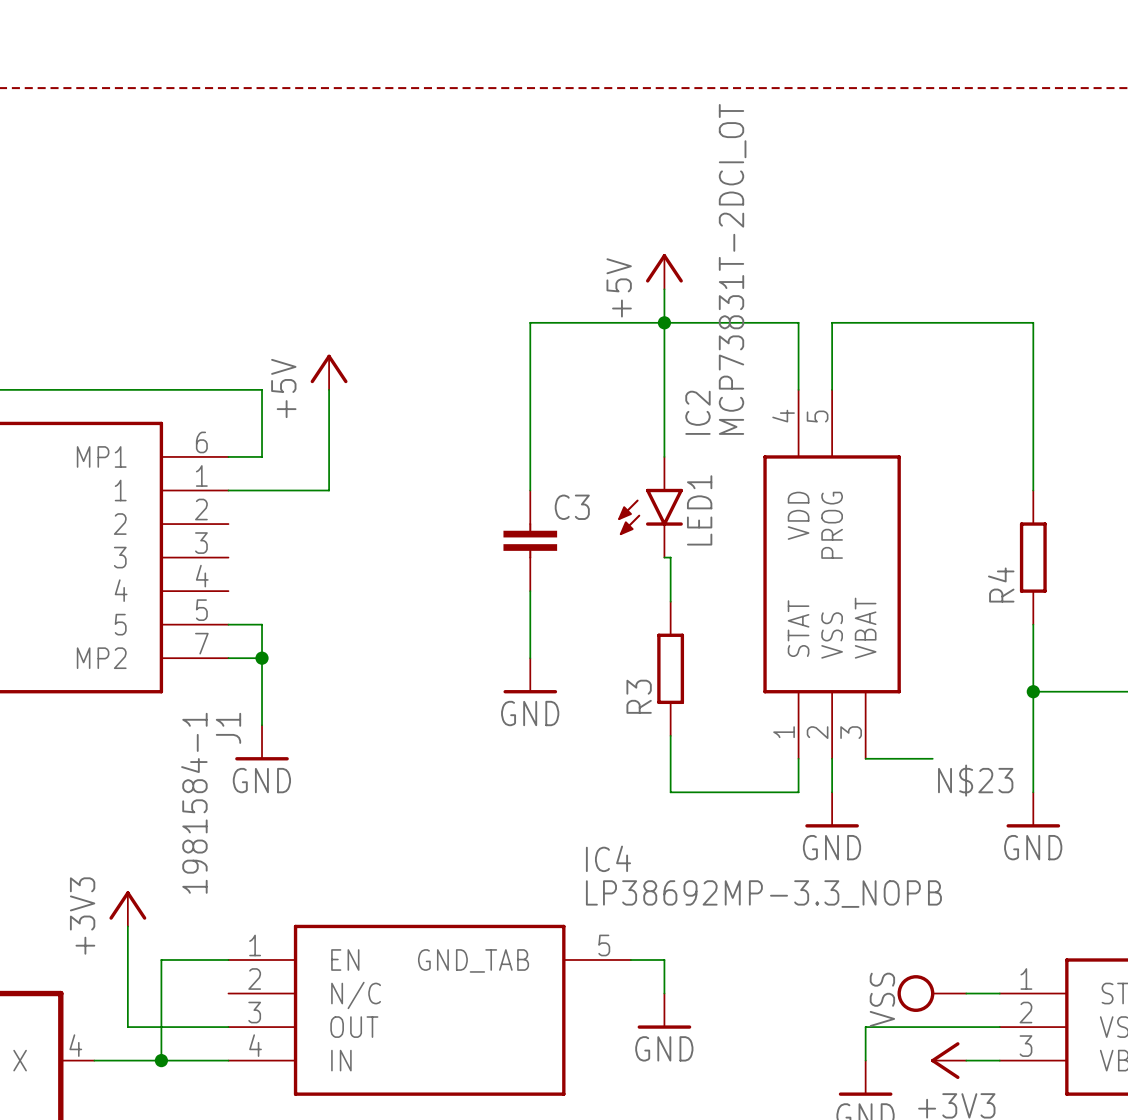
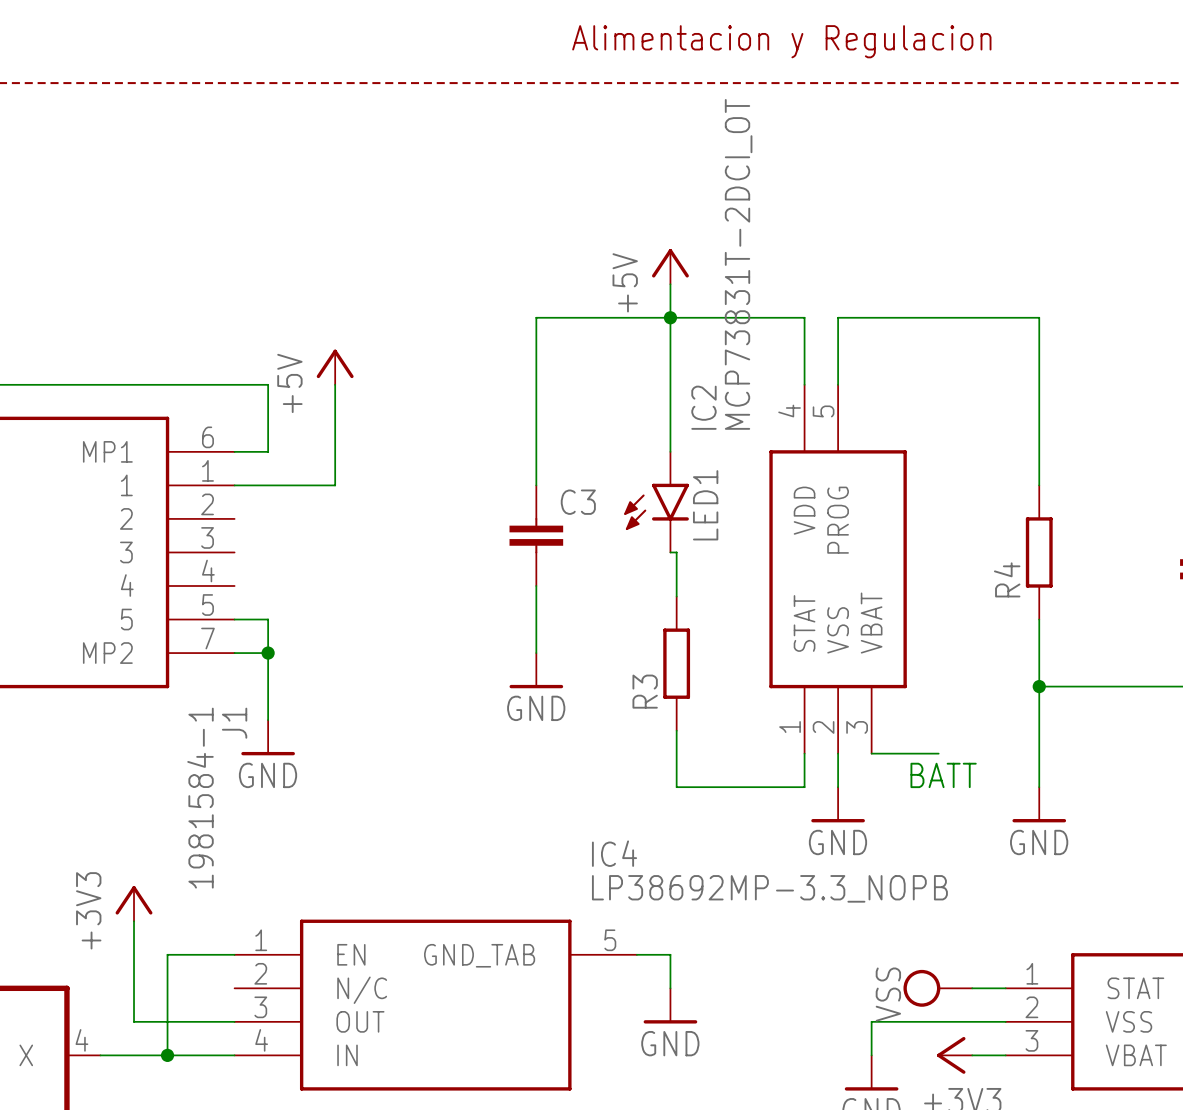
text: none -> Alimentacion y Regulacion (781, 41)
text: none -> BATT (943, 775)
label: N$23 (975, 780) -> none

